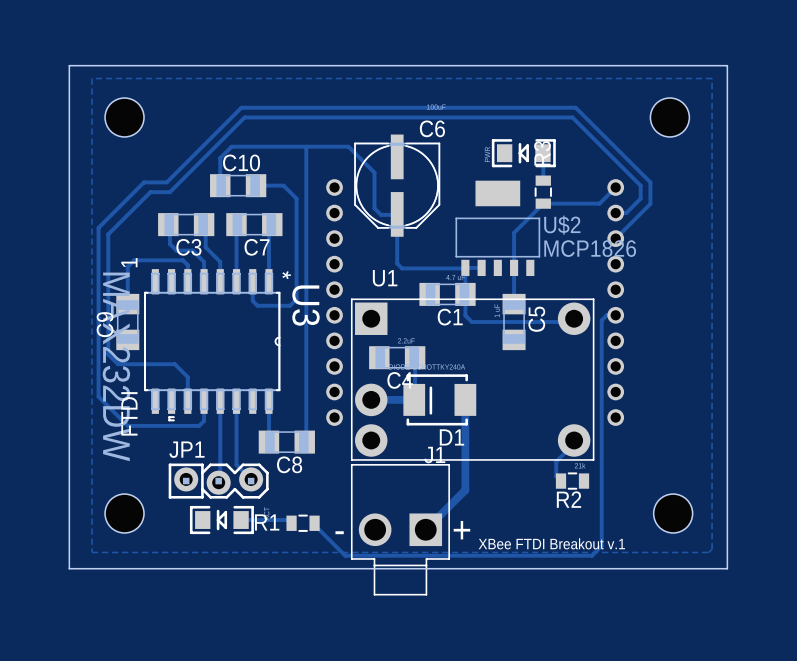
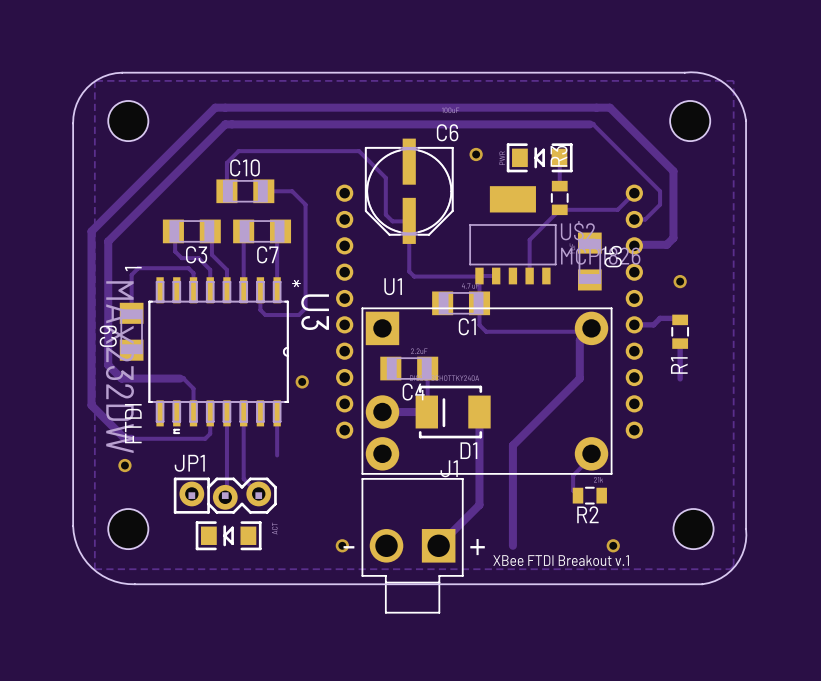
board edge: (69, 65) (727, 65) (727, 568) (69, 568) (69, 65) -> (122, 72) (103, 76) (87, 87) (79, 98) (73, 116) (73, 525) (74, 539) (79, 551) (87, 562) (97, 572) (114, 581) (134, 584) (702, 584) (720, 578) (735, 565) (742, 554) (746, 535) (746, 120) (740, 102) (725, 83) (709, 75) (690, 72) (122, 72)
track: (575, 120) (572, 117) (244, 117) (169, 192) (150, 192) (108, 234) (108, 354) (118, 364) (174, 364) (178, 367) -> (593, 124) (225, 124) (108, 241) (108, 365) (121, 378) (183, 378)
track: (306, 146) (306, 440) (304, 442) -> none
via: none -> (476, 154)
track: (616, 237) (650, 203) (650, 182) (575, 107) (241, 107) (166, 182) (144, 182) (98, 227) (98, 396) (127, 425) -> (635, 244) (666, 244) (673, 238) (673, 171) (609, 107) (215, 107) (91, 231) (91, 405) (124, 438) (131, 438)
track: (514, 267) (514, 304) -> none
via: none -> (680, 281)
track: (615, 315) (606, 315) (601, 320) (601, 545) (591, 555) (345, 555) (314, 523) -> (634, 324) (653, 324) (660, 318) (680, 319)
track: none -> (591, 328) (579, 340) (579, 378) (512, 445) (512, 545)
C5 position: (514, 322) -> (589, 261)
track: none -> (680, 343) (680, 378)
via: none -> (302, 381)
C8: (286, 442) -> none
via: none -> (124, 465)
track: (241, 520) (288, 520) (291, 523) -> none
R1 name position: R1 (267, 522) -> R1 (679, 365)
R1 rotation: 0° (303, 523) -> 90° clockwise (680, 331)
R1 position: (303, 523) -> (680, 331)
via: none -> (342, 545)
via: none -> (613, 545)

